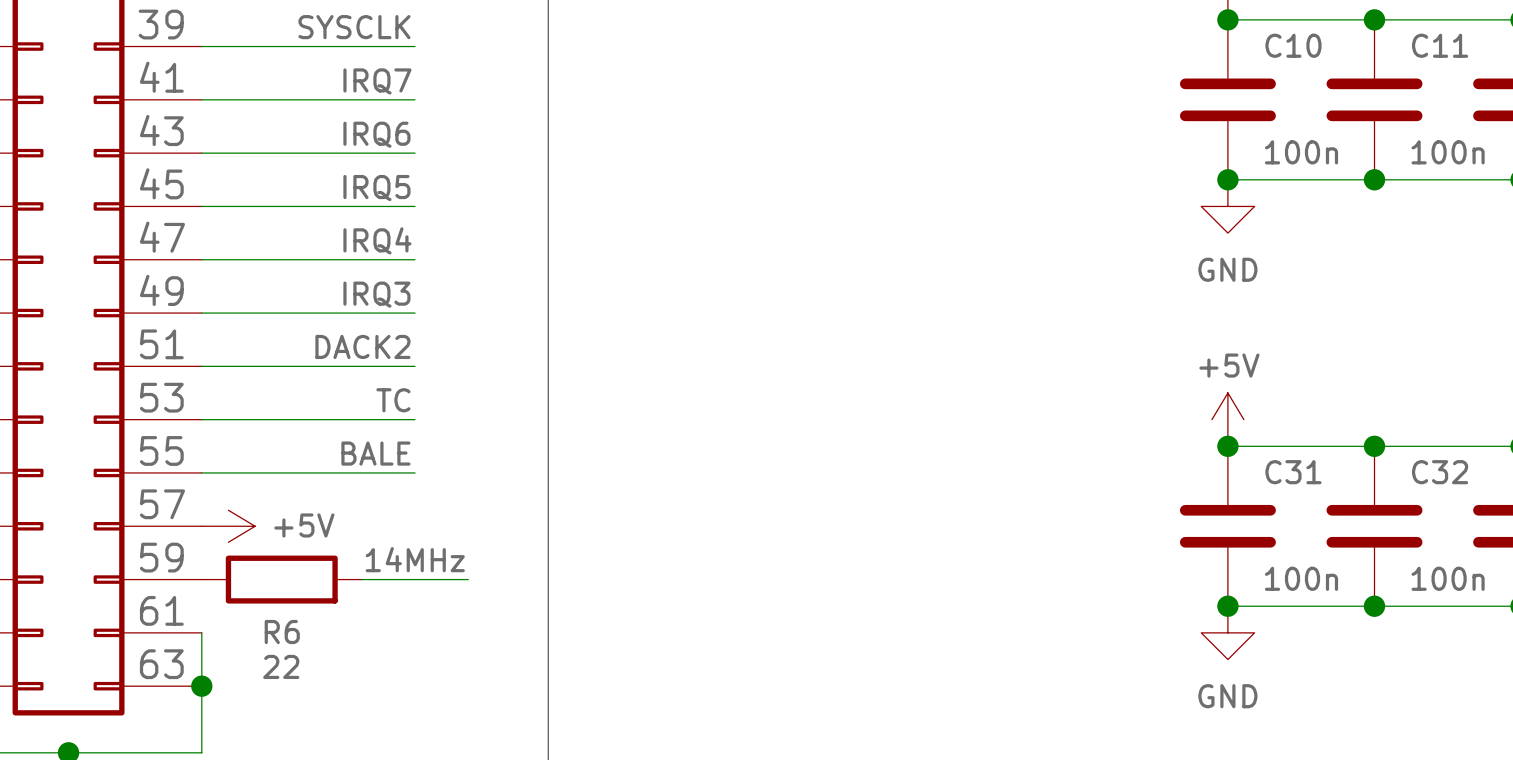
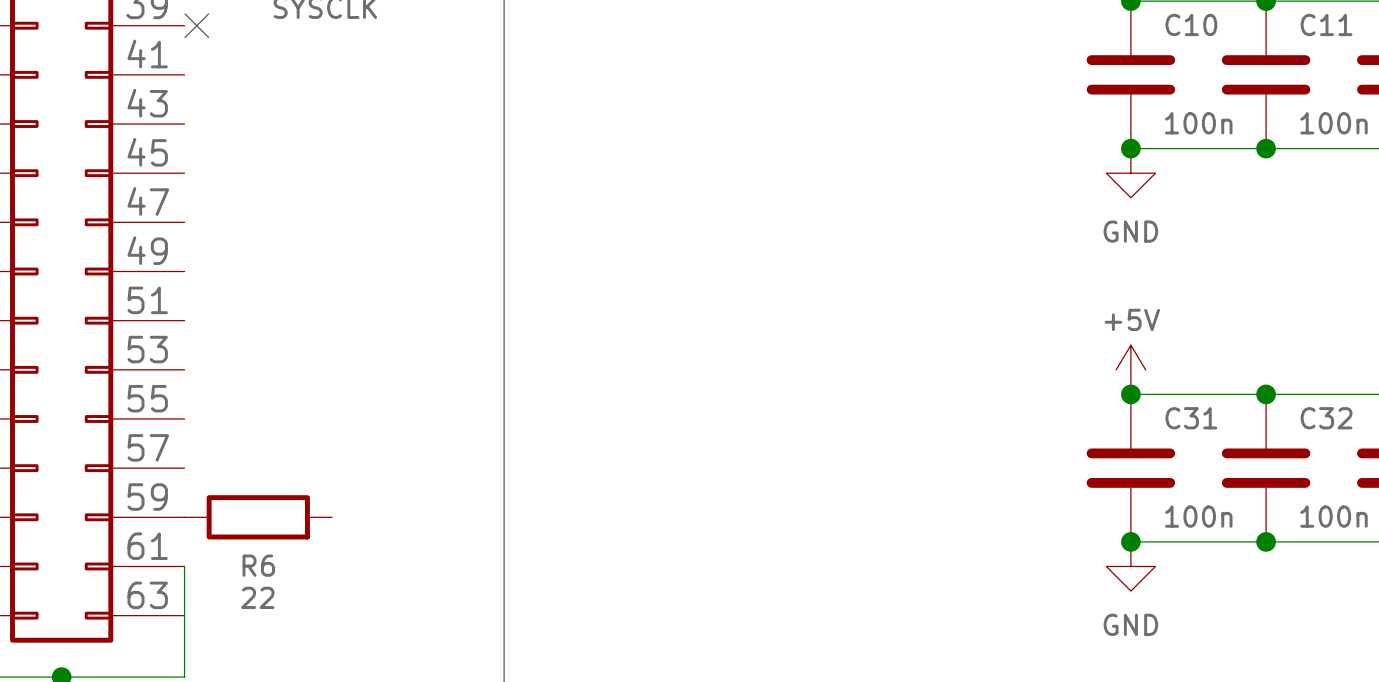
wire: (201, 46) (415, 46) -> none
no-connect mark: none -> (196, 25)
label: IRQ7 (377, 81) -> none
wire: (201, 99) (415, 99) -> none
label: IRQ6 (376, 134) -> none
wire: (201, 153) (415, 153) -> none
label: IRQ5 (376, 188) -> none
wire: (201, 206) (415, 206) -> none
label: IRQ4 (377, 240) -> none
wire: (201, 259) (415, 259) -> none
label: IRQ3 (376, 294) -> none
wire: (201, 313) (415, 313) -> none
label: DACK2 (362, 346) -> none
wire: (201, 366) (415, 366) -> none
label: TC (393, 400) -> none
wire: (201, 419) (415, 419) -> none
label: BALE (375, 453) -> none
wire: (201, 472) (415, 472) -> none
power symbol: +5V (228, 526) -> none
label: 14MHz (415, 559) -> none
wire: (361, 579) (468, 579) -> none
junction: (201, 686) -> none

